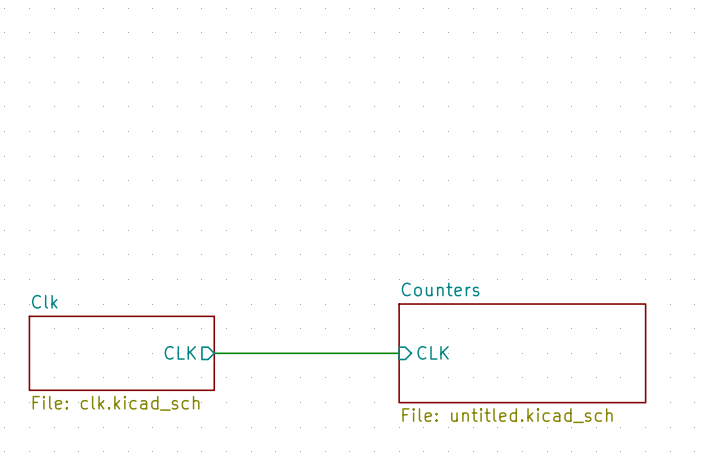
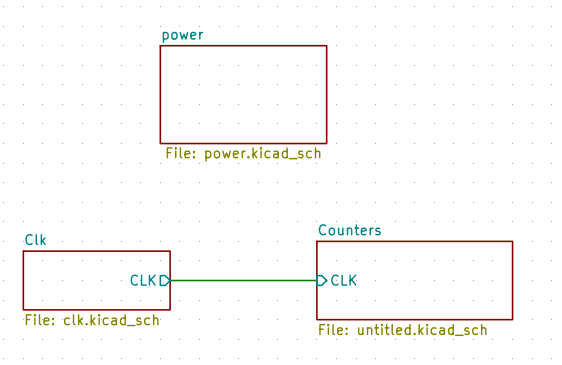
sheet power: none -> File: power.kicad_sch (243, 94)

